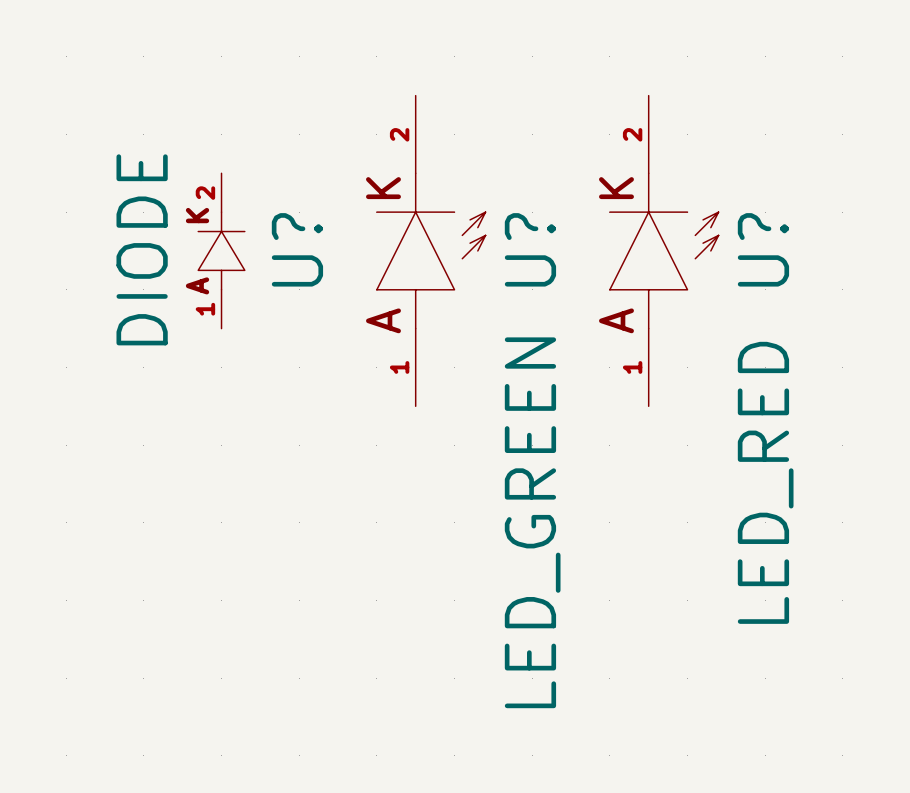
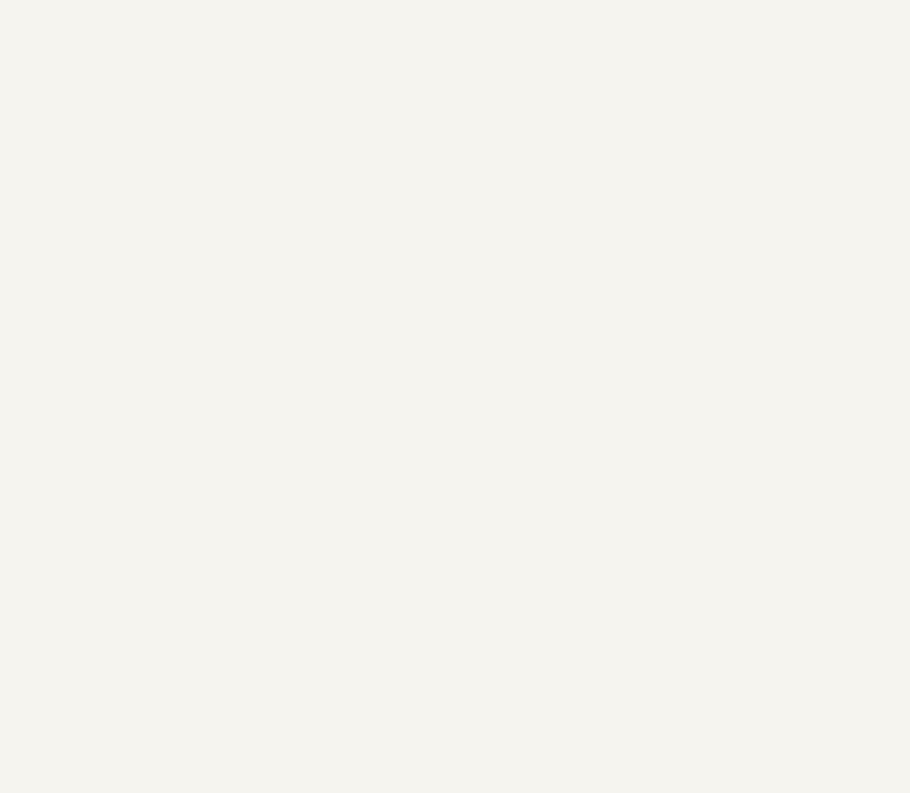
U?: DIODE (221, 250) -> none
U?: LED_GREEN (431, 250) -> none
U?: LED_RED (664, 250) -> none

